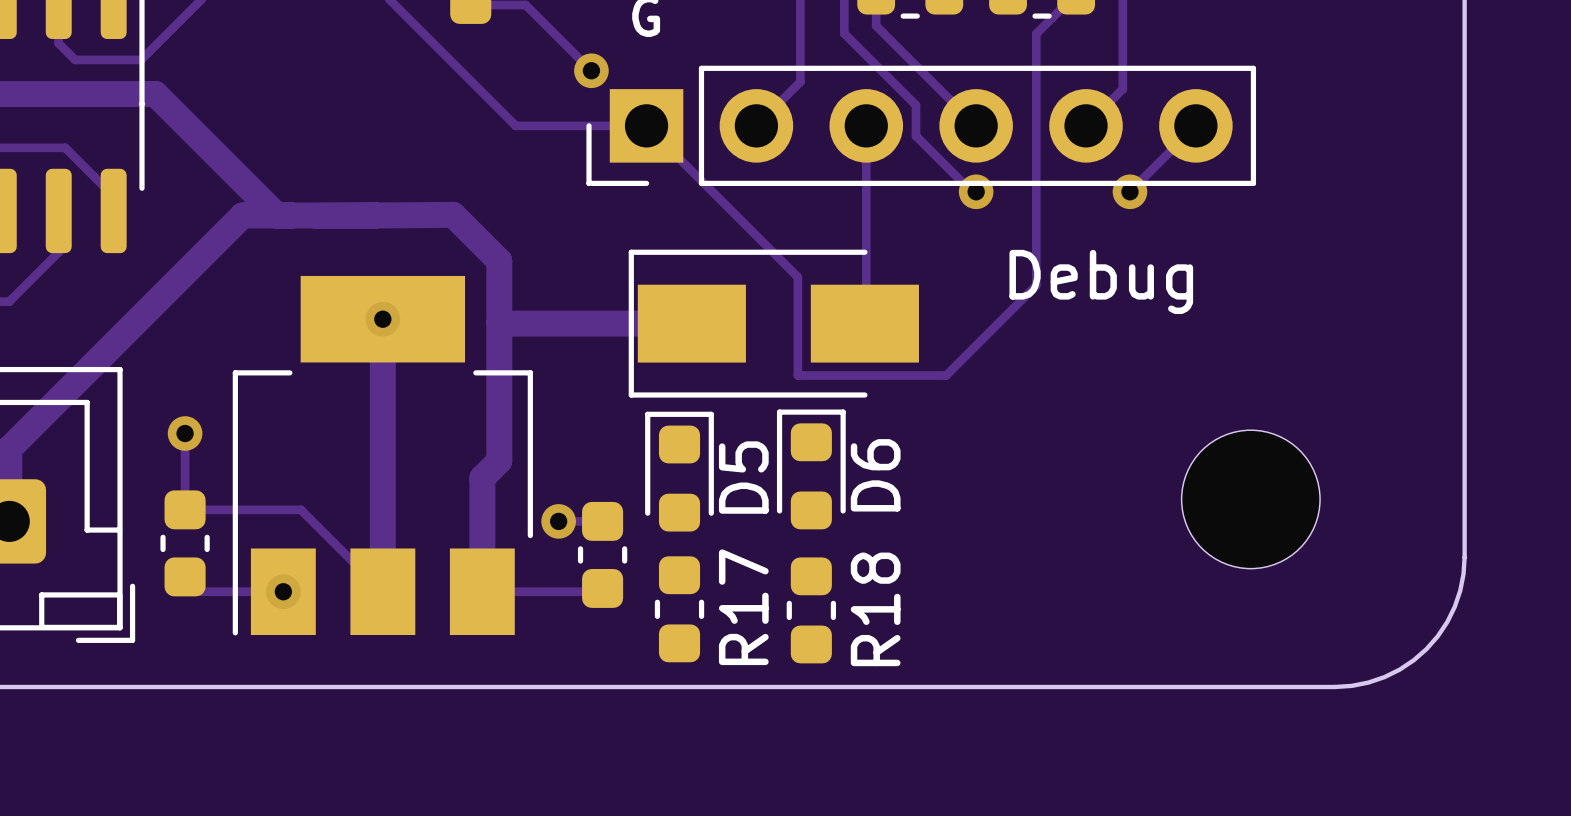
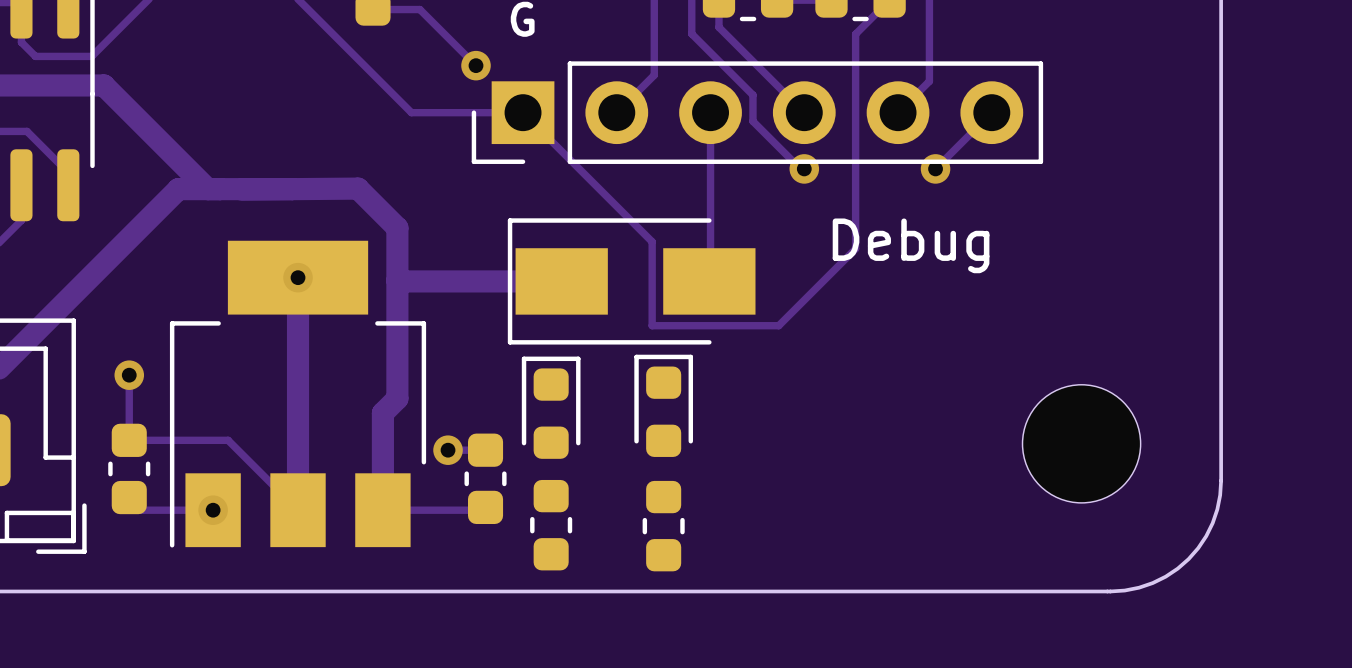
D6 name: D6 (875, 475) -> none
D5 name: D5 (743, 477) -> none
part position: (1250, 499) -> (1081, 443)
R17 name: R17 (743, 607) -> none
R18 name: R18 (875, 609) -> none

